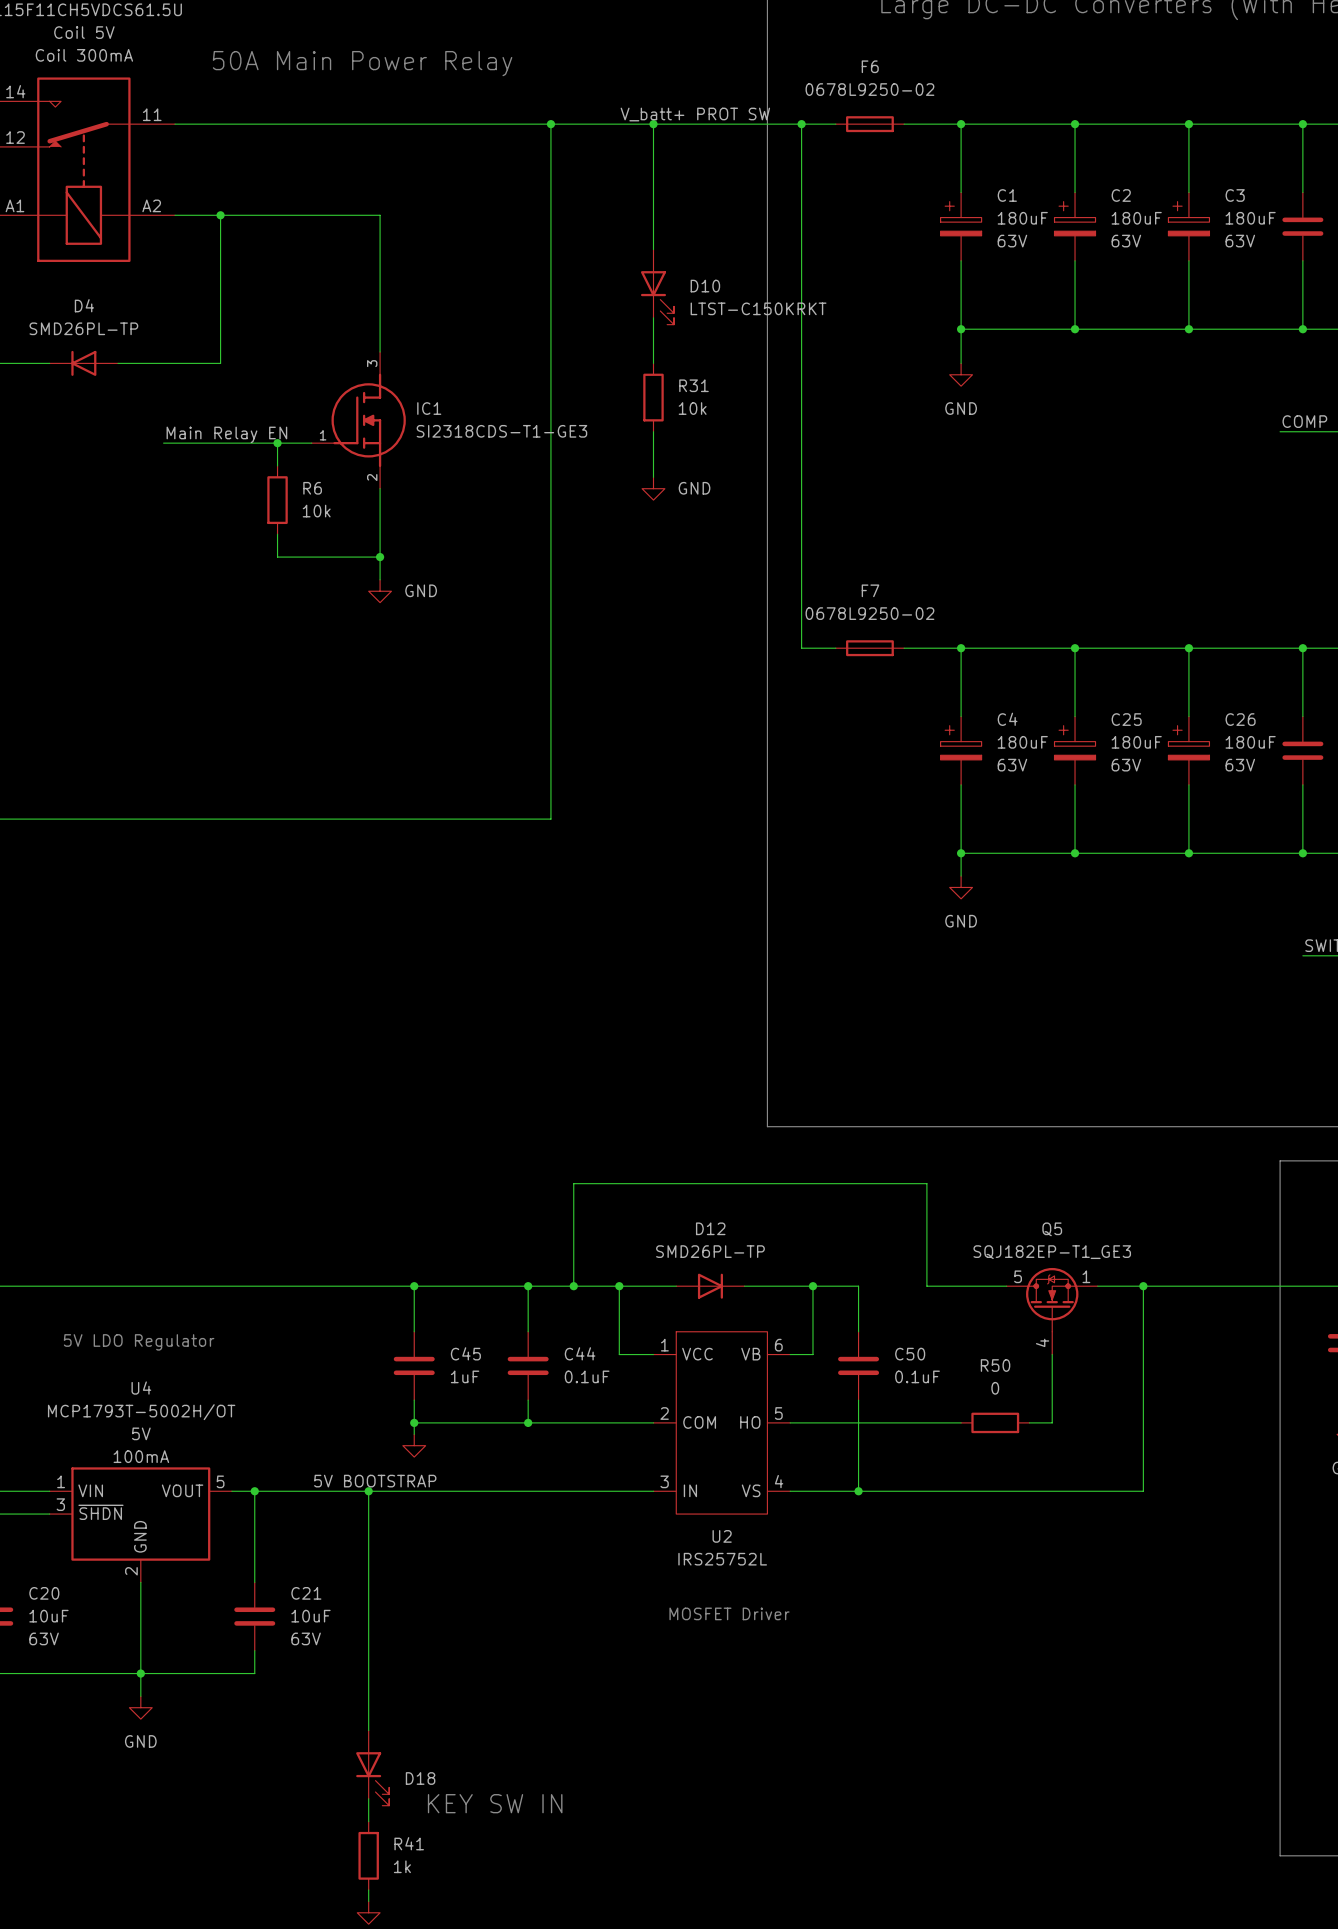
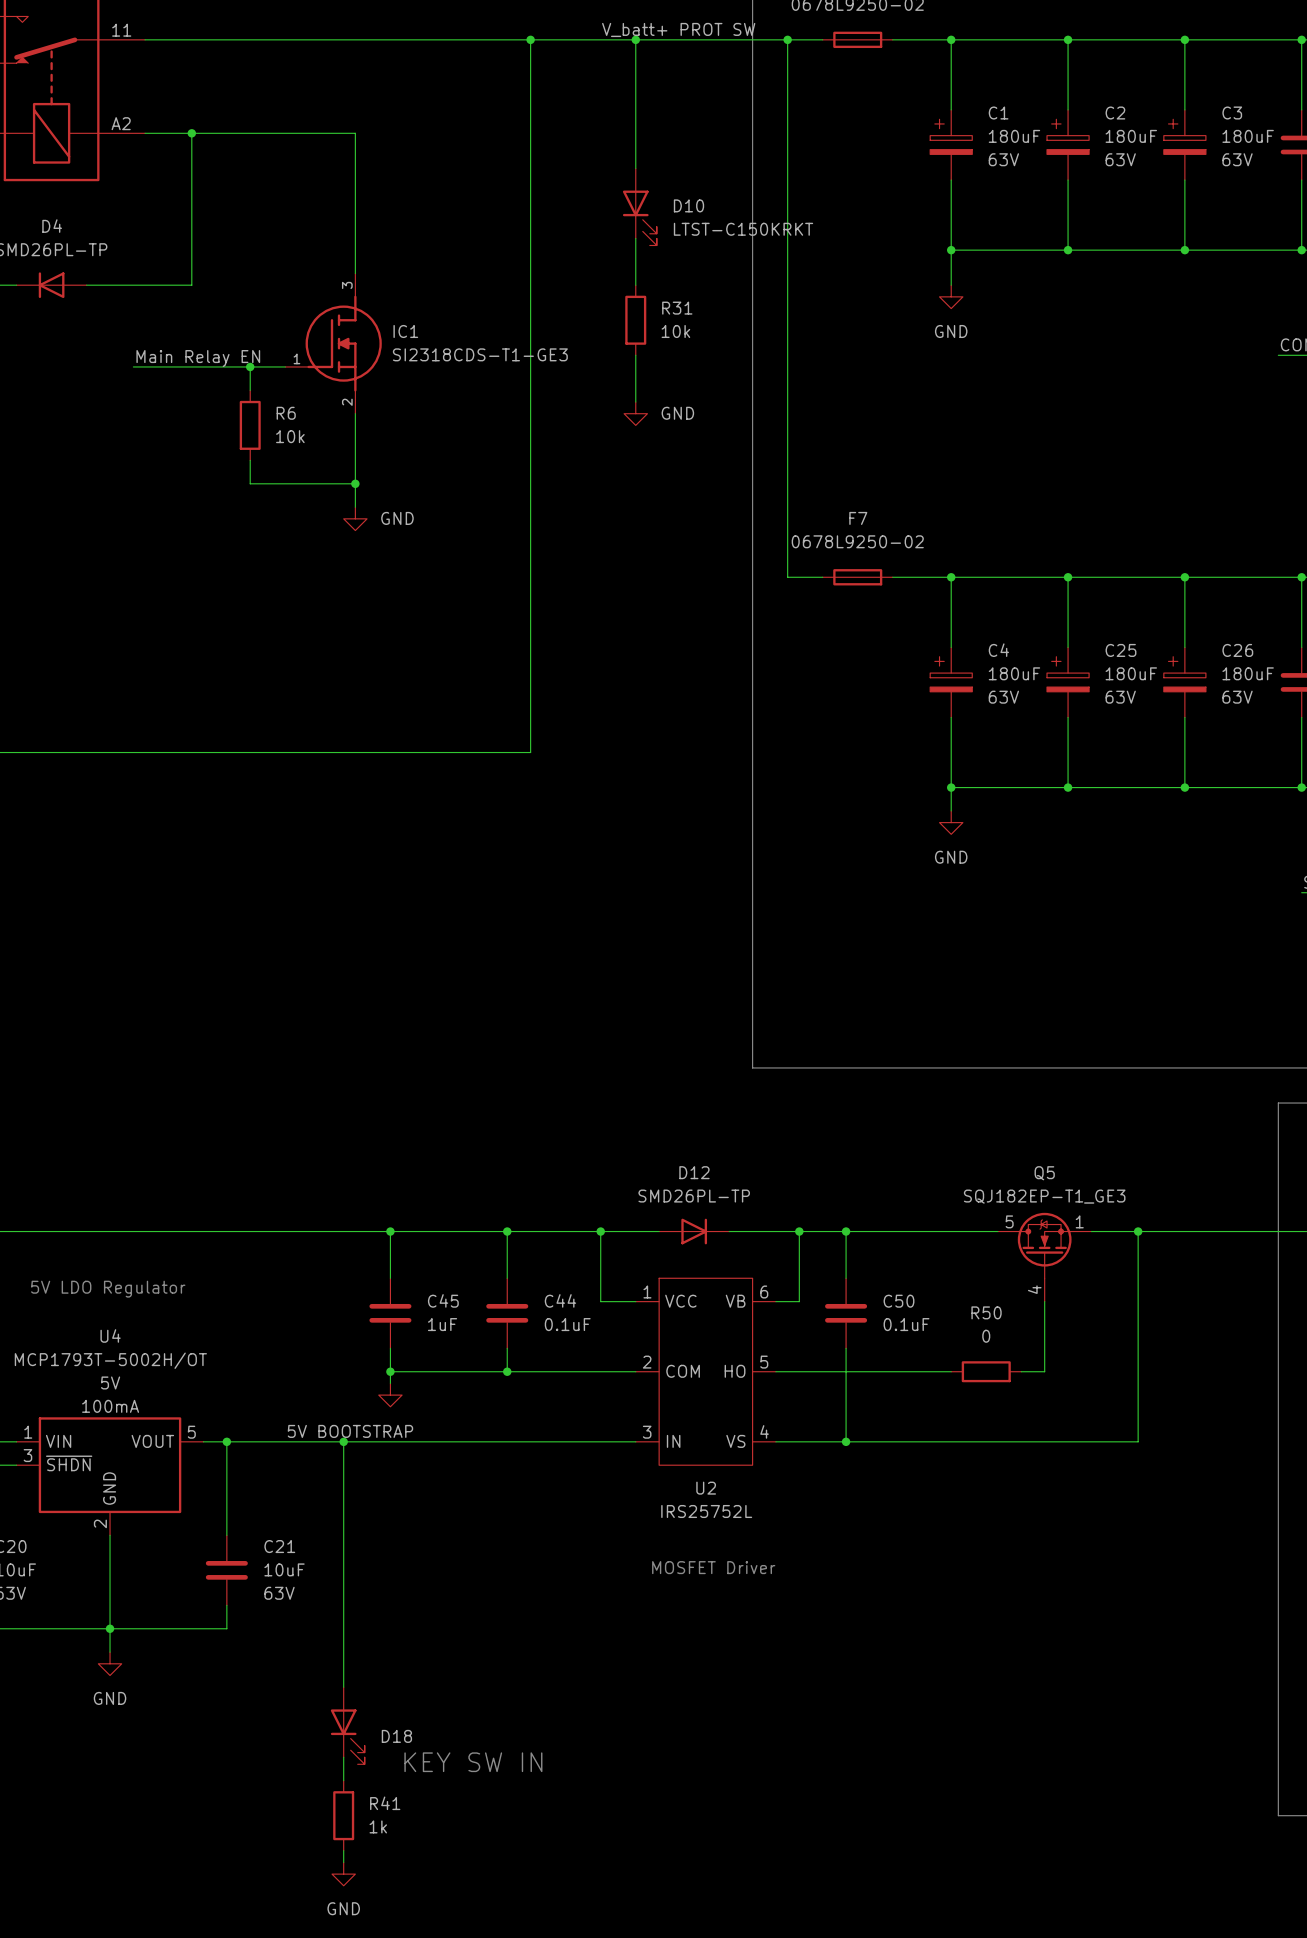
wire: (573, 1286) (573, 1183) (926, 1183) (926, 1286) -> (846, 1231) (916, 1231)
junction: (573, 1286) -> none
junction: none -> (846, 1231)

